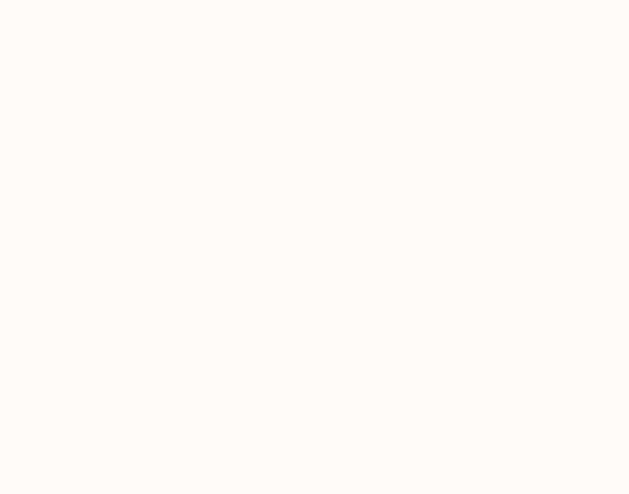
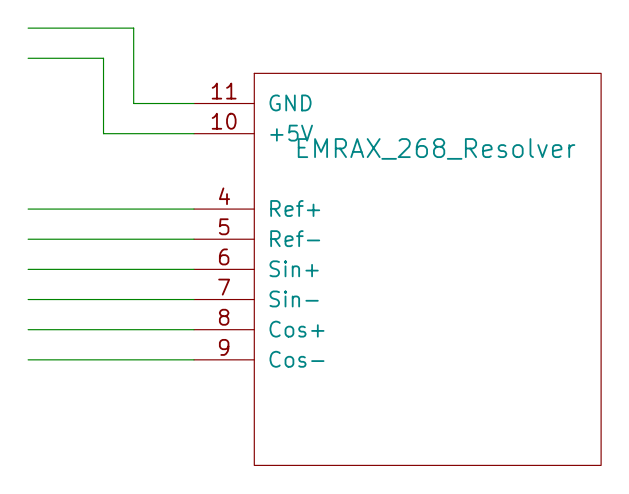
wire: none -> (28, 28) (133, 28) (133, 103) (193, 103)
wire: none -> (28, 58) (103, 58) (103, 133) (193, 133)
wire: none -> (28, 209) (193, 209)
wire: none -> (28, 239) (193, 239)
wire: none -> (28, 269) (193, 269)
part: none -> EMRAX_268_Resolver (397, 269)
wire: none -> (28, 299) (193, 299)
wire: none -> (28, 329) (193, 329)
wire: none -> (28, 359) (193, 359)

